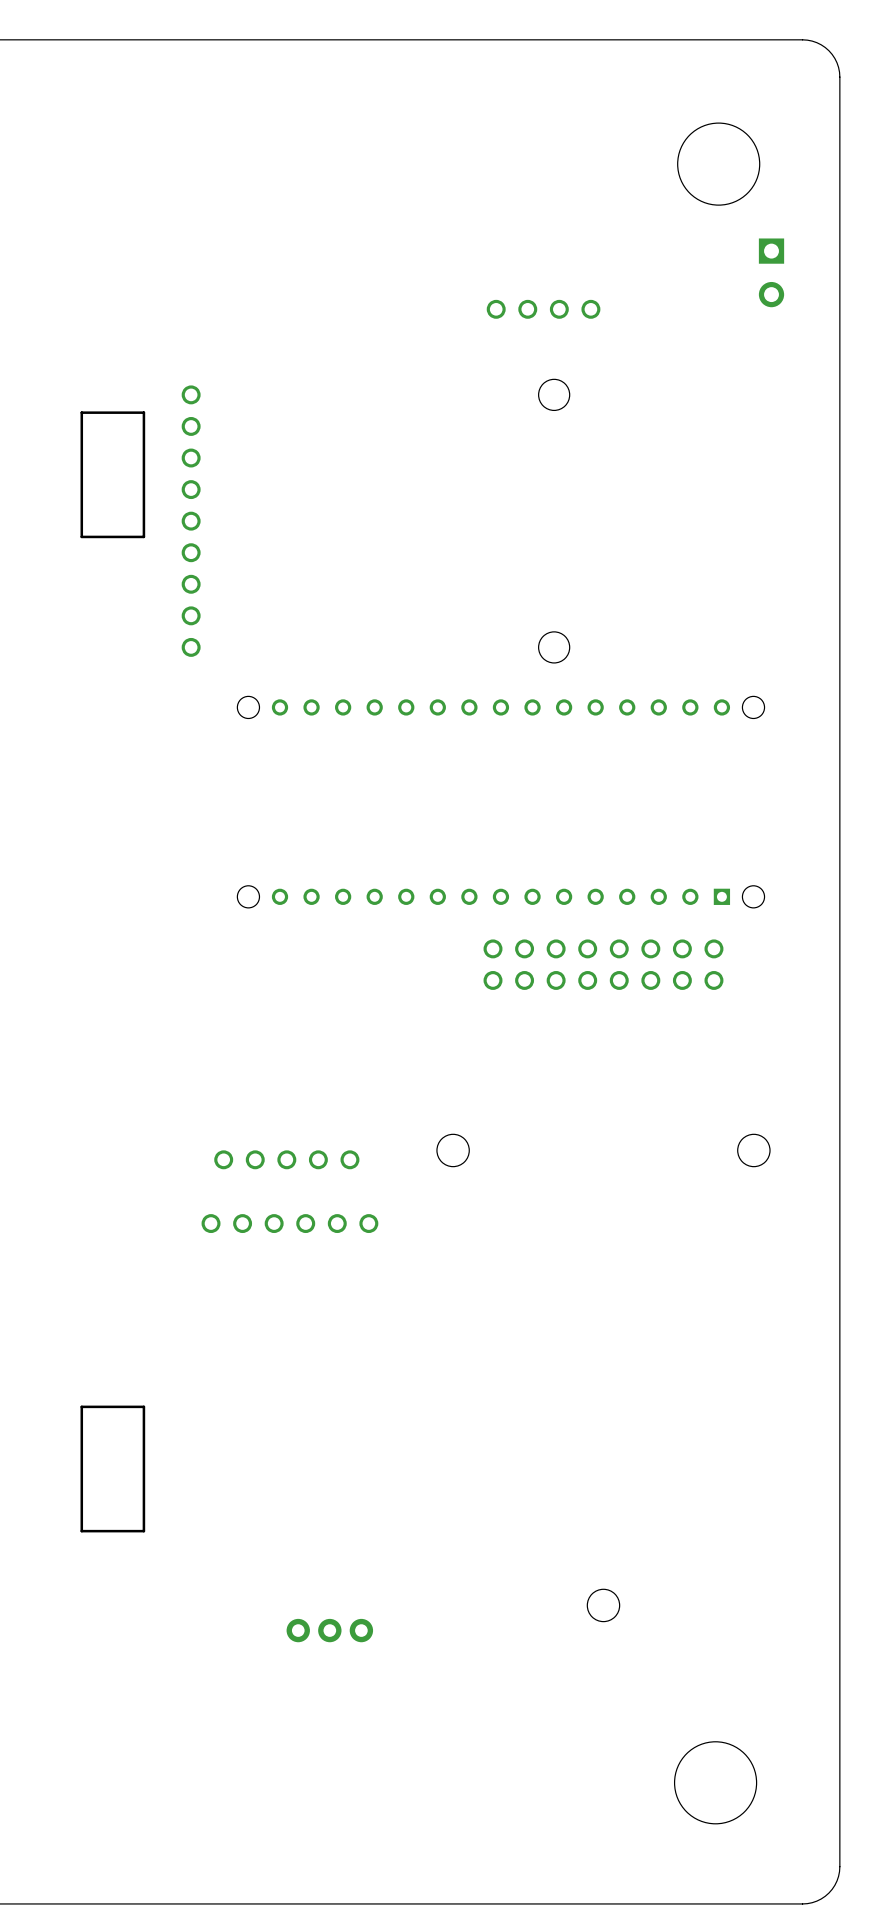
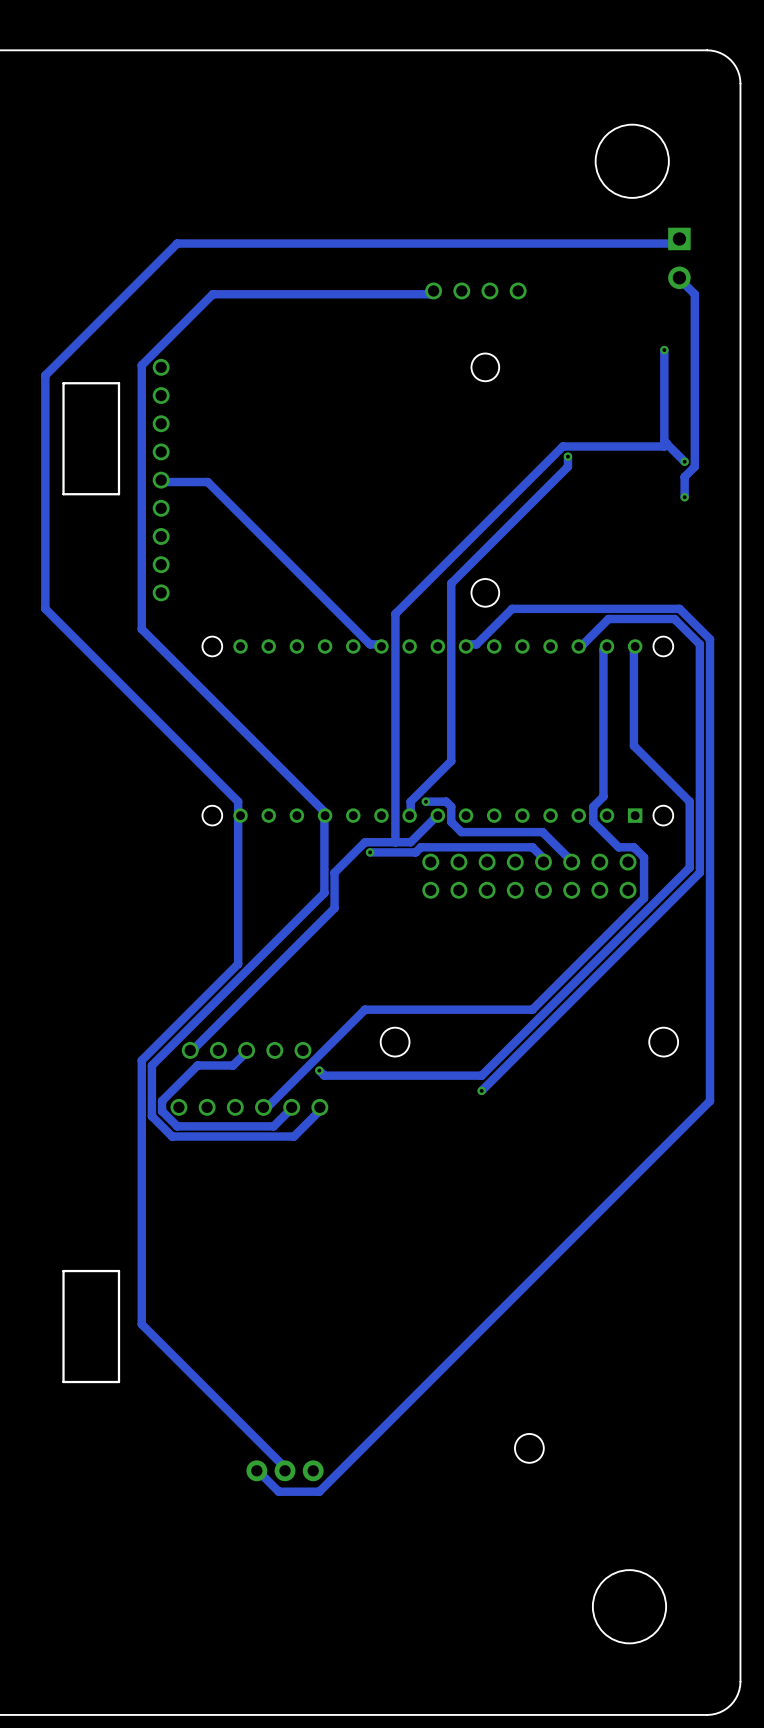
track: none -> (679, 238) (674, 243) (177, 243) (45, 375) (45, 608) (238, 801) (238, 811) (240, 815) (238, 816) (238, 964) (141, 1060) (141, 1324) (283, 1466) (285, 1470)
track: none -> (679, 277) (694, 294) (694, 466) (684, 476) (684, 497)
track: none -> (433, 290) (430, 294) (212, 294) (141, 365) (141, 629) (324, 811) (325, 815) (324, 892) (151, 1065) (151, 1116) (172, 1136) (293, 1136) (319, 1111) (319, 1107)
track: none -> (664, 350) (664, 441) (684, 461)
via: none -> (664, 350)
track: none -> (666, 443) (664, 446) (562, 446) (395, 613) (395, 842)
track: none -> (567, 456) (567, 466) (451, 583) (451, 761) (410, 801) (409, 815)
via: none -> (567, 456)
via: none -> (684, 461)
track: none -> (161, 480) (162, 482) (207, 482) (370, 644) (380, 644) (381, 646)
via: none -> (684, 497)
track: none -> (466, 646) (466, 644) (476, 644) (512, 608) (679, 608) (710, 639) (710, 1101) (319, 1491) (278, 1491) (256, 1470)
track: none -> (578, 646) (608, 619) (674, 619) (699, 644) (699, 872) (481, 1090)
track: none -> (606, 646) (603, 649) (603, 796) (593, 806) (593, 821) (618, 847) (633, 847) (644, 857) (644, 898) (532, 1009) (365, 1009) (263, 1111) (263, 1107)
track: none -> (635, 646) (633, 745) (689, 801) (689, 867) (481, 1075) (324, 1075) (319, 1070)
track: none -> (425, 801) (446, 801) (451, 806) (451, 821) (461, 832) (542, 832) (571, 862)
via: none -> (425, 801)
track: none -> (437, 815) (410, 842) (365, 842) (334, 872) (334, 908) (190, 1050)
track: none -> (370, 852) (415, 852) (420, 847) (532, 847) (542, 857) (543, 862)
via: none -> (370, 852)
track: none -> (246, 1050) (233, 1065) (197, 1065) (162, 1101) (162, 1111) (177, 1126) (273, 1126) (291, 1107)
via: none -> (319, 1070)
via: none -> (481, 1090)

